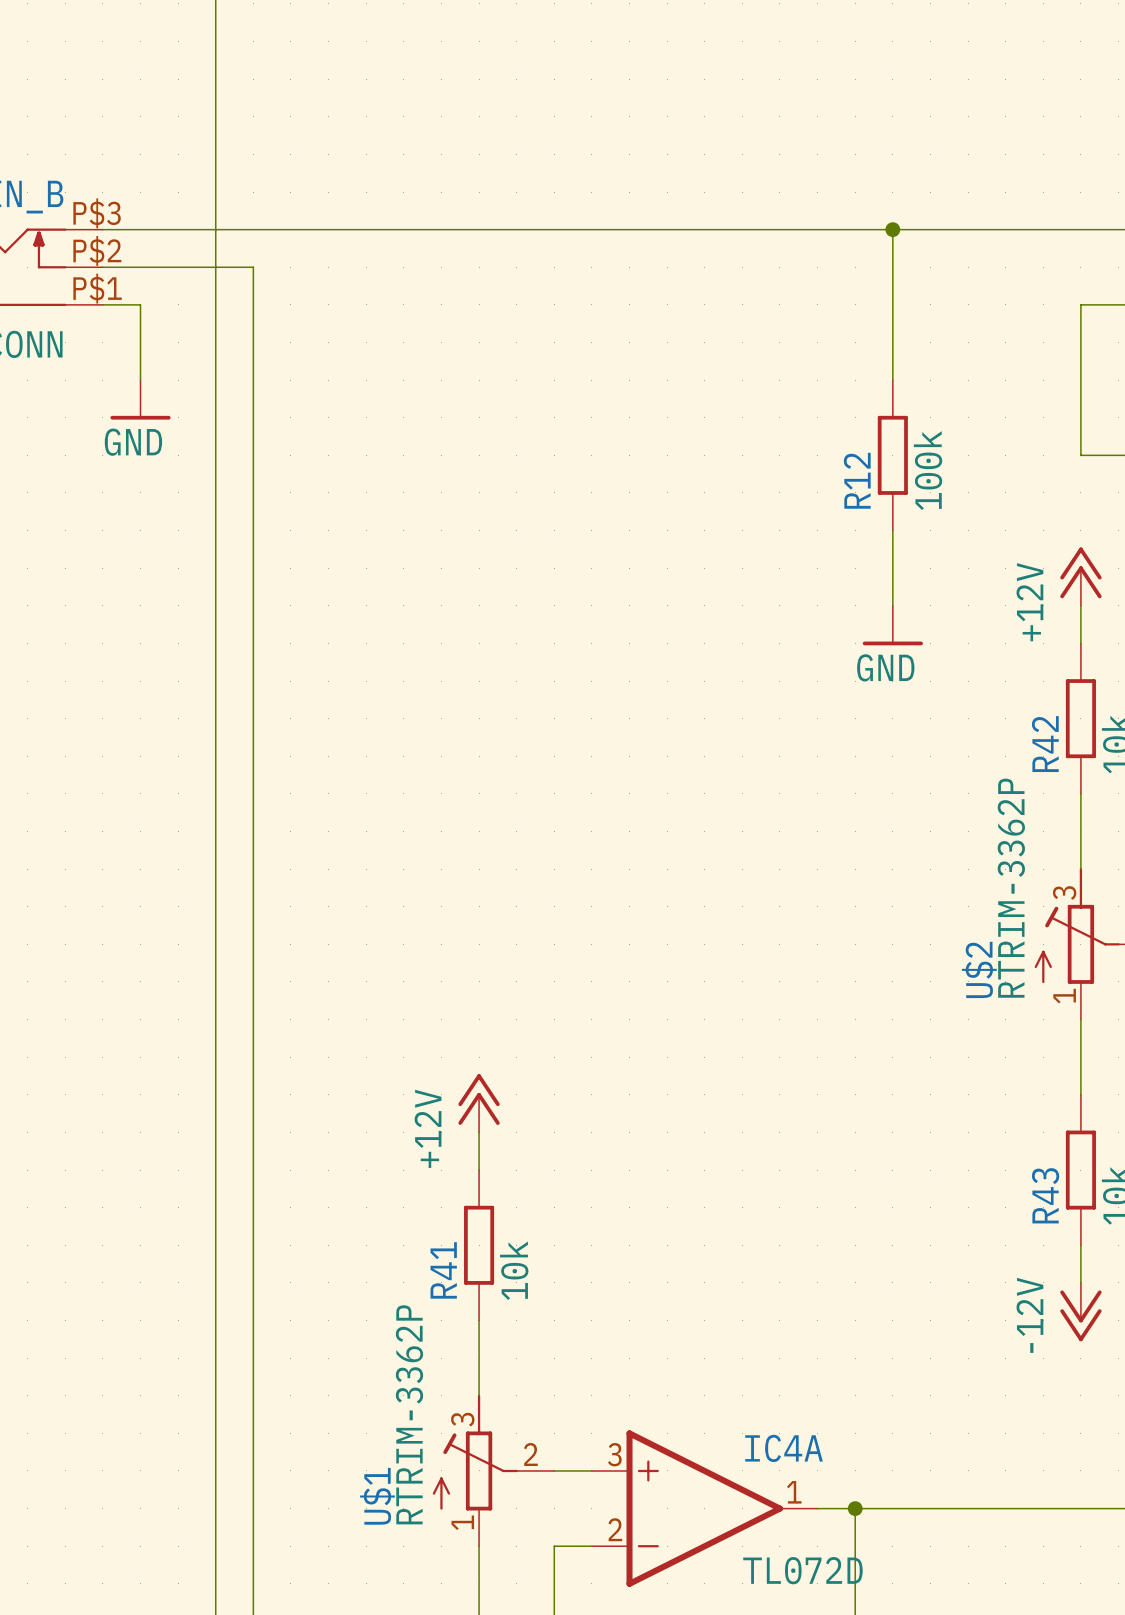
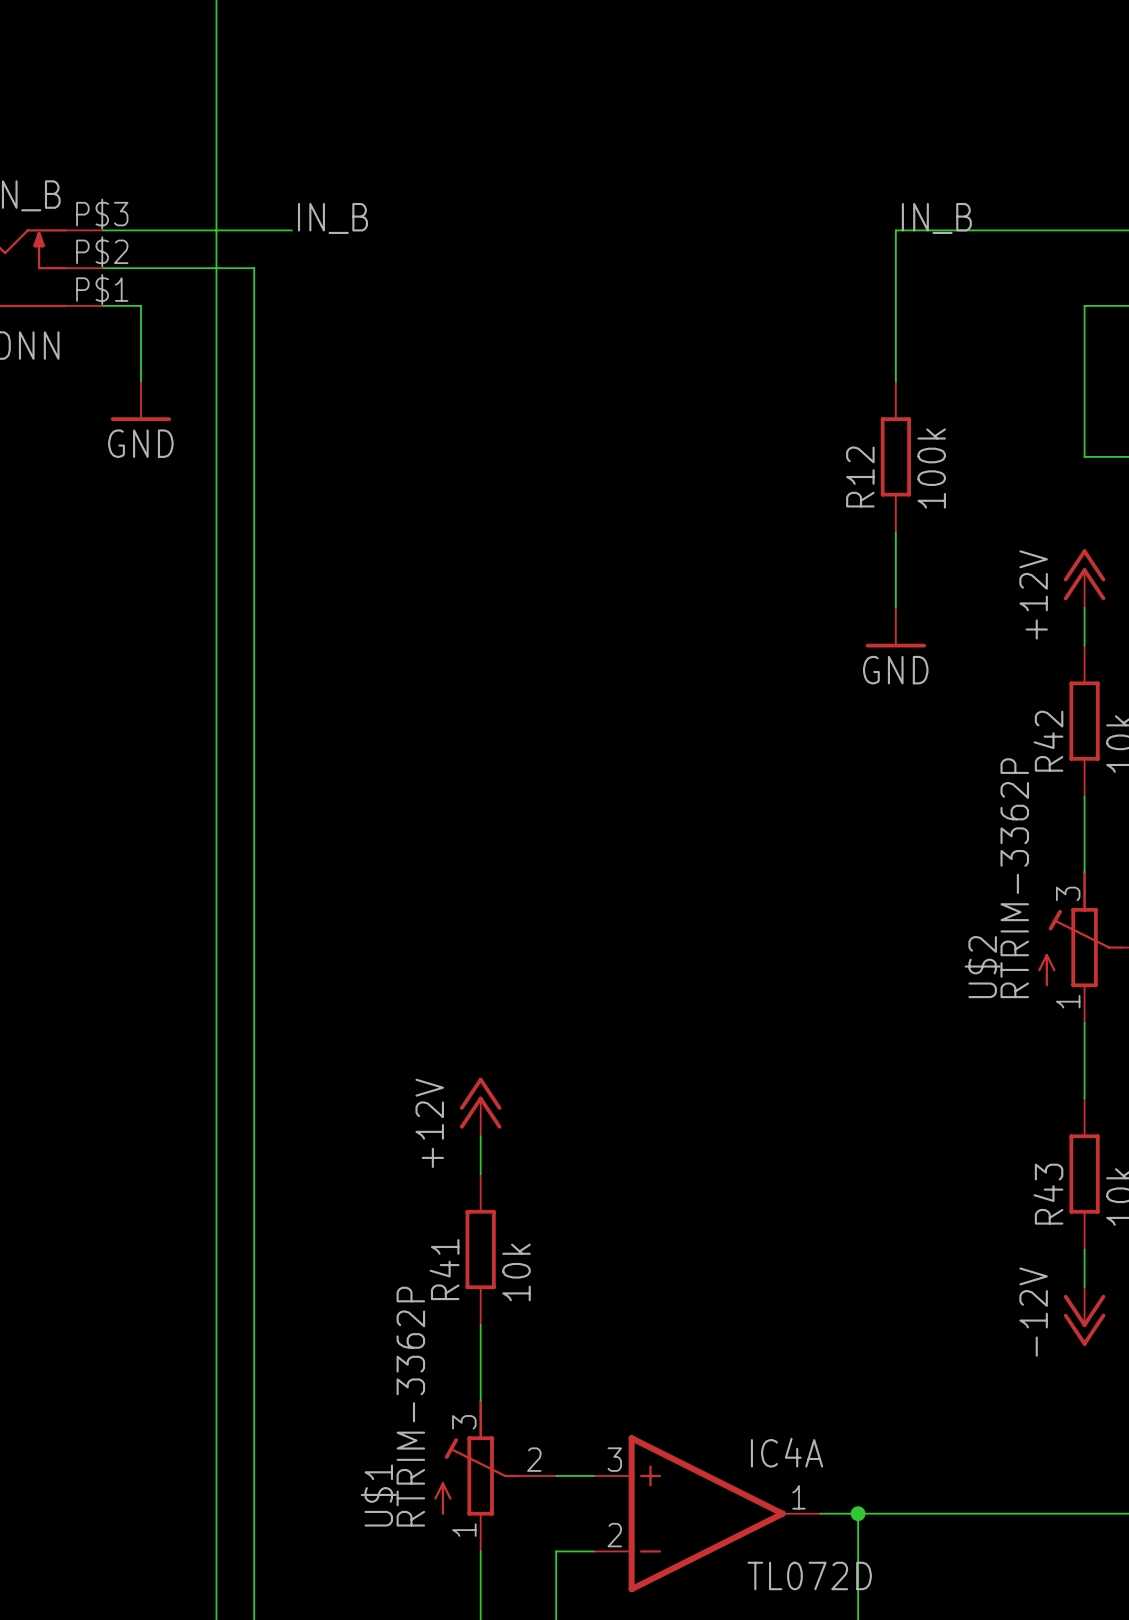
label: none -> IN_B (332, 218)
label: none -> IN_B (936, 218)
wire: (290, 229) (892, 229) -> none
junction: (892, 229) -> none

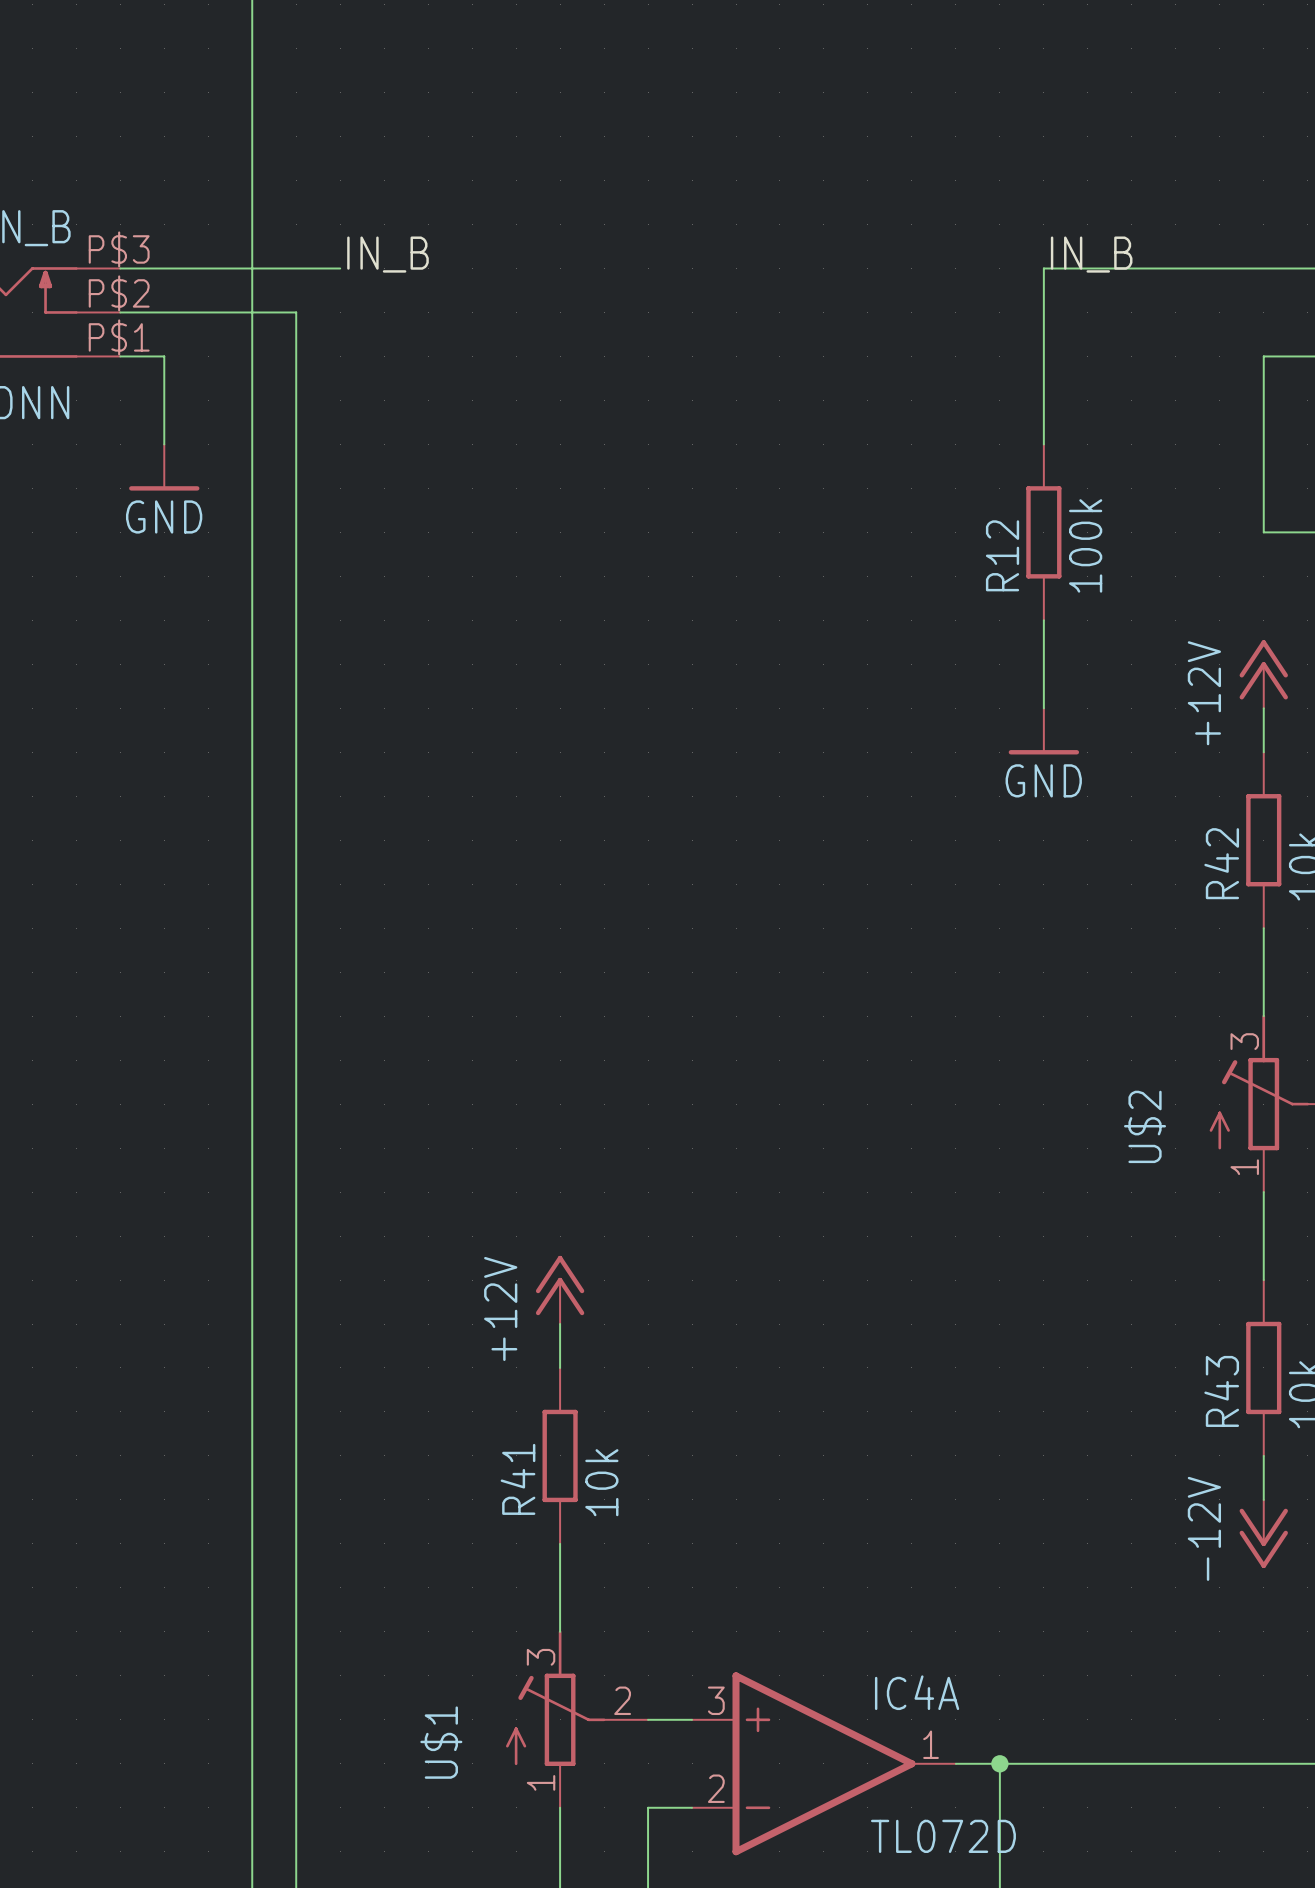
U$2 value: RTRIM-3362P (1014, 878) -> none
U$1 value: RTRIM-3362P (410, 1406) -> none

